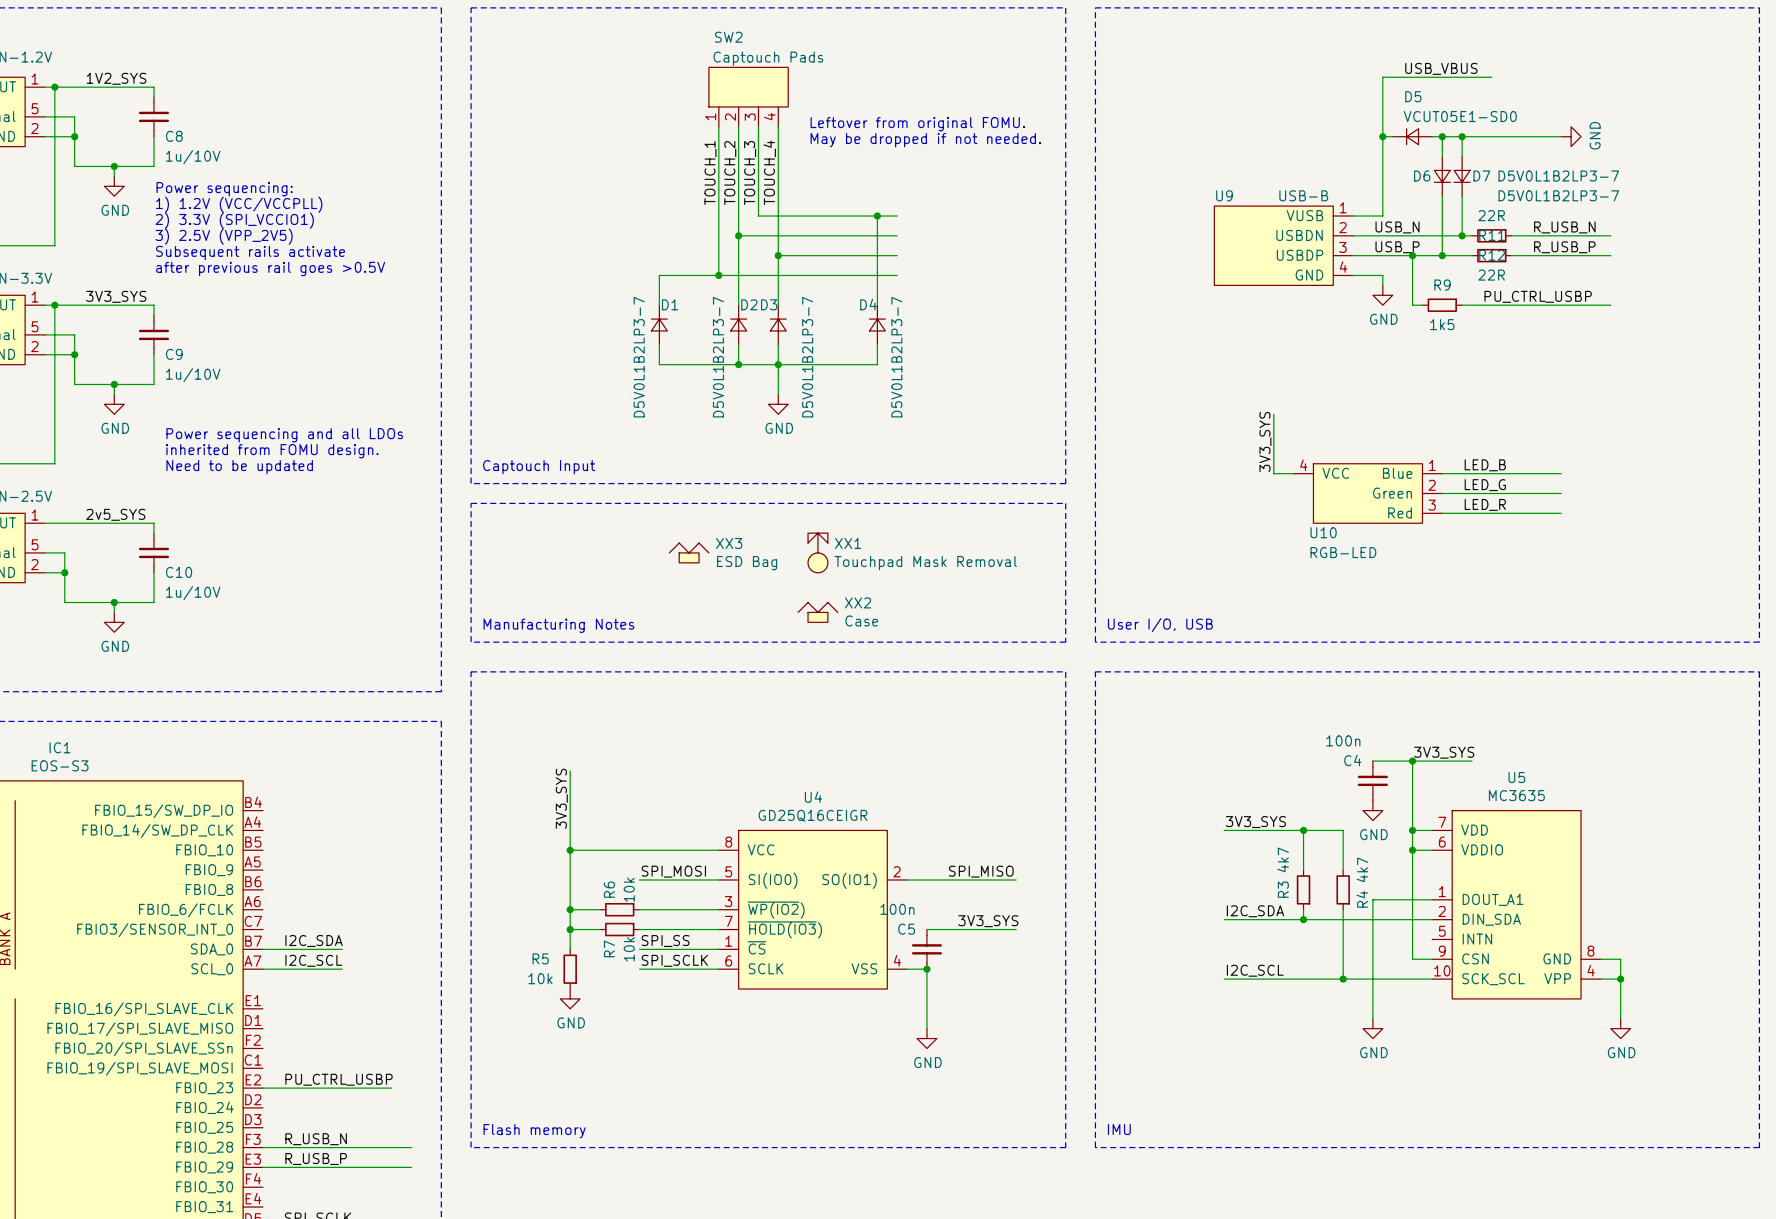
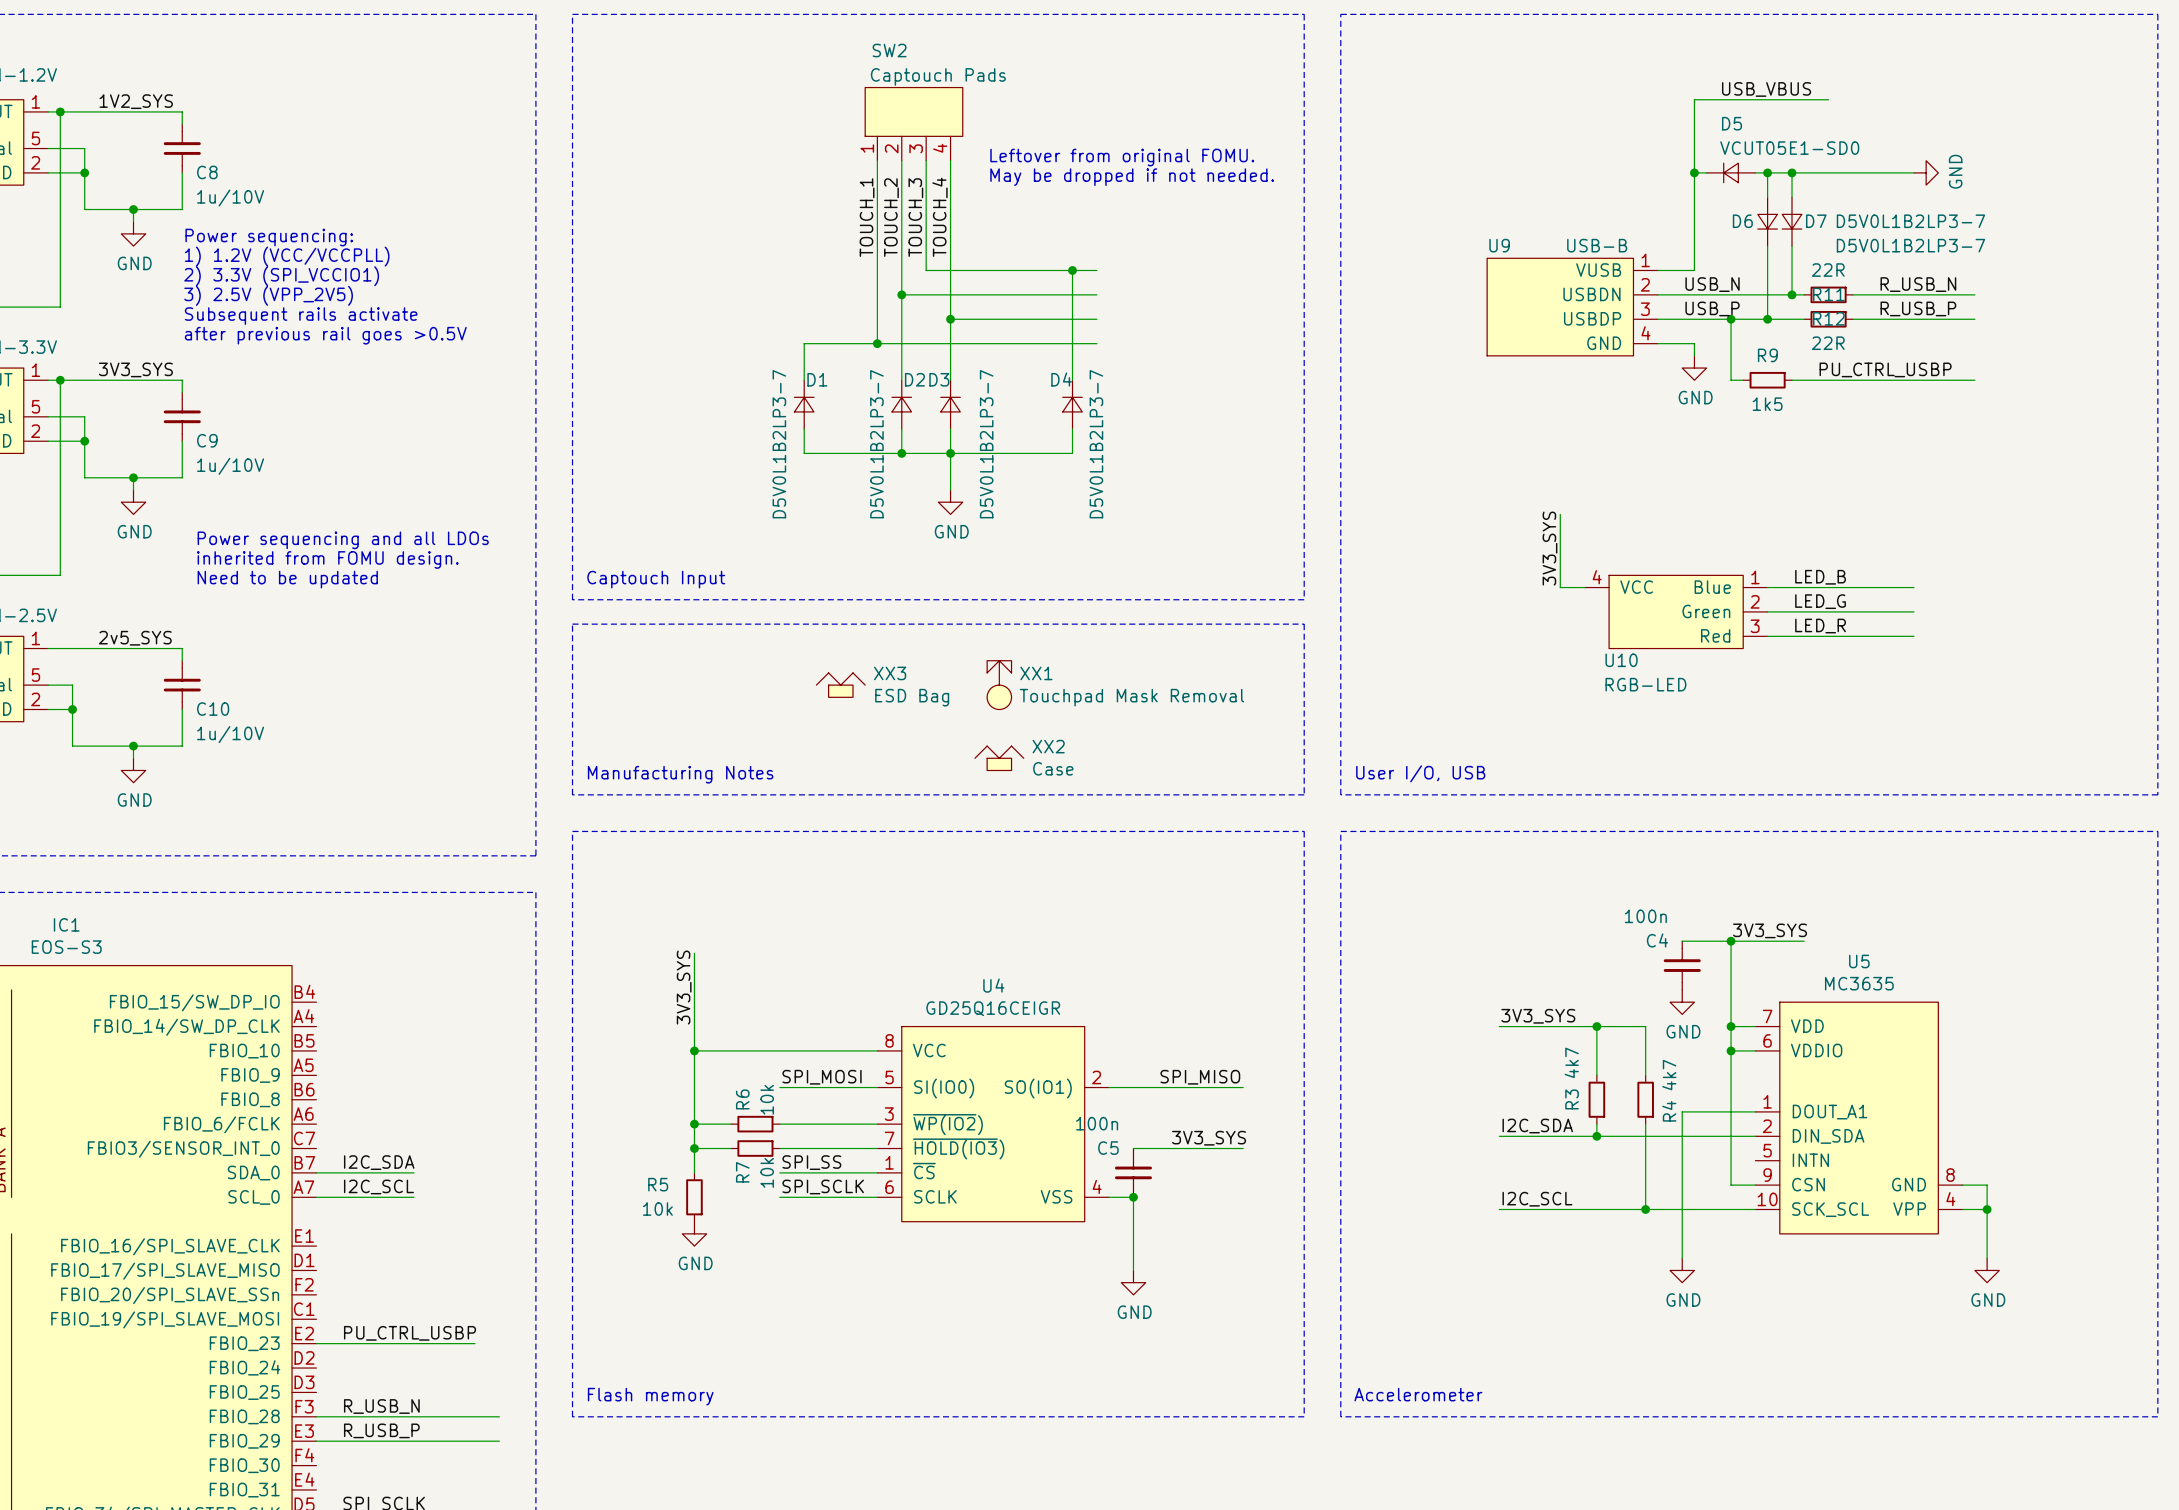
text: IMU (1119, 1129) -> Accelerometer (1418, 1394)

